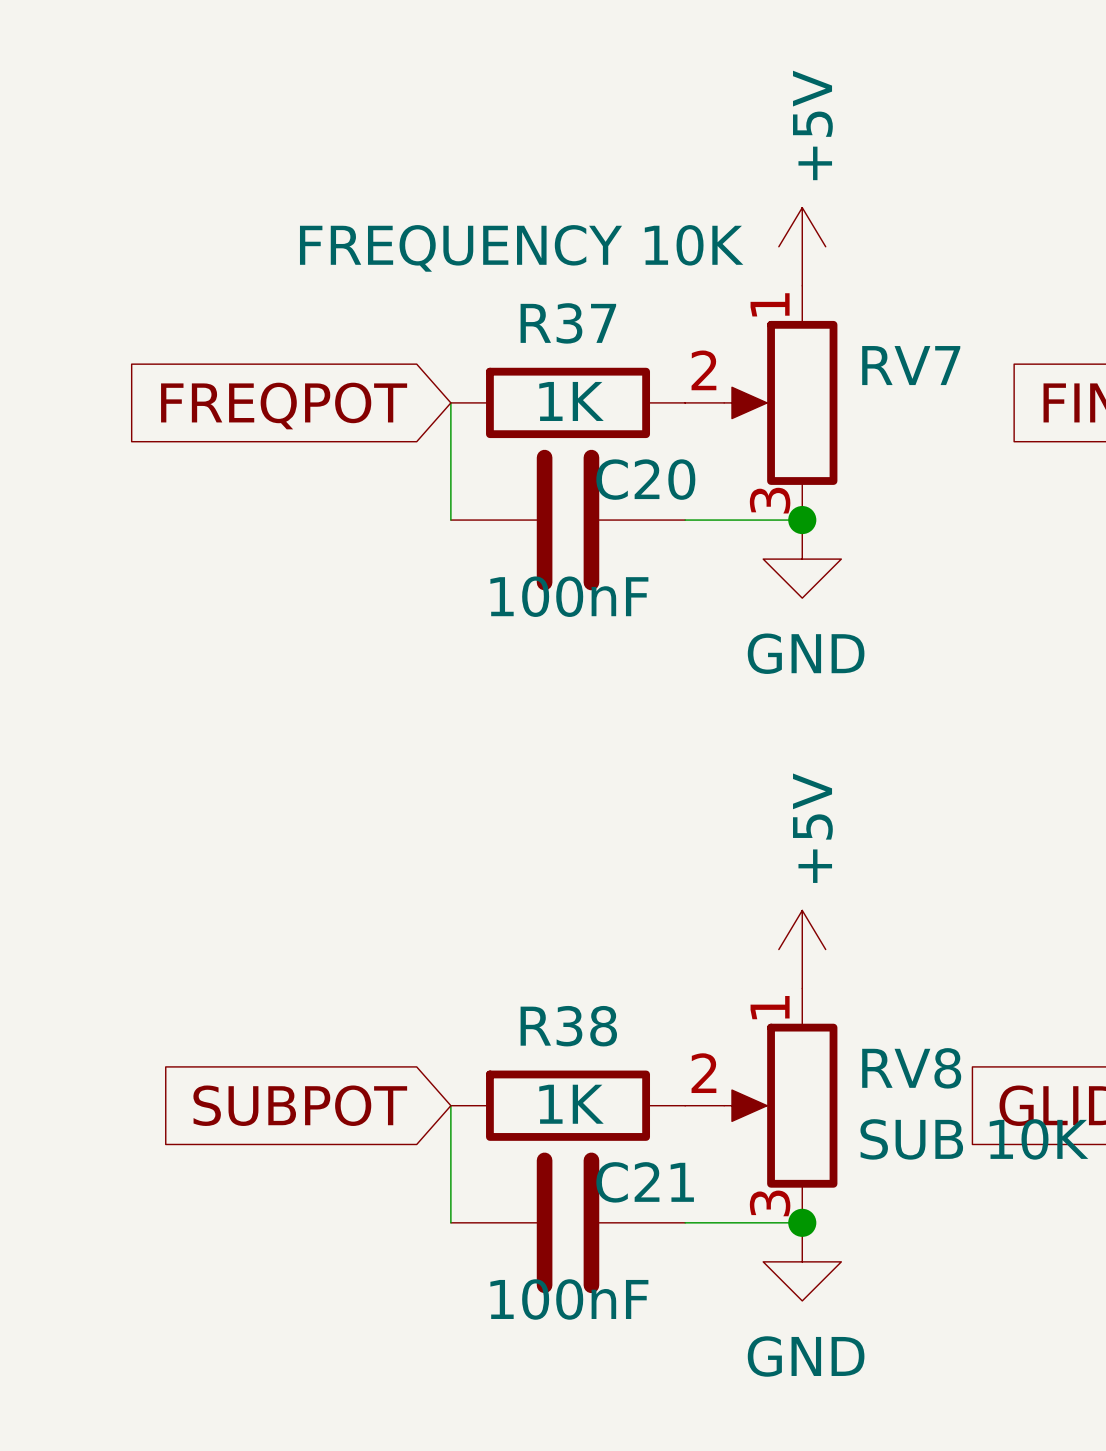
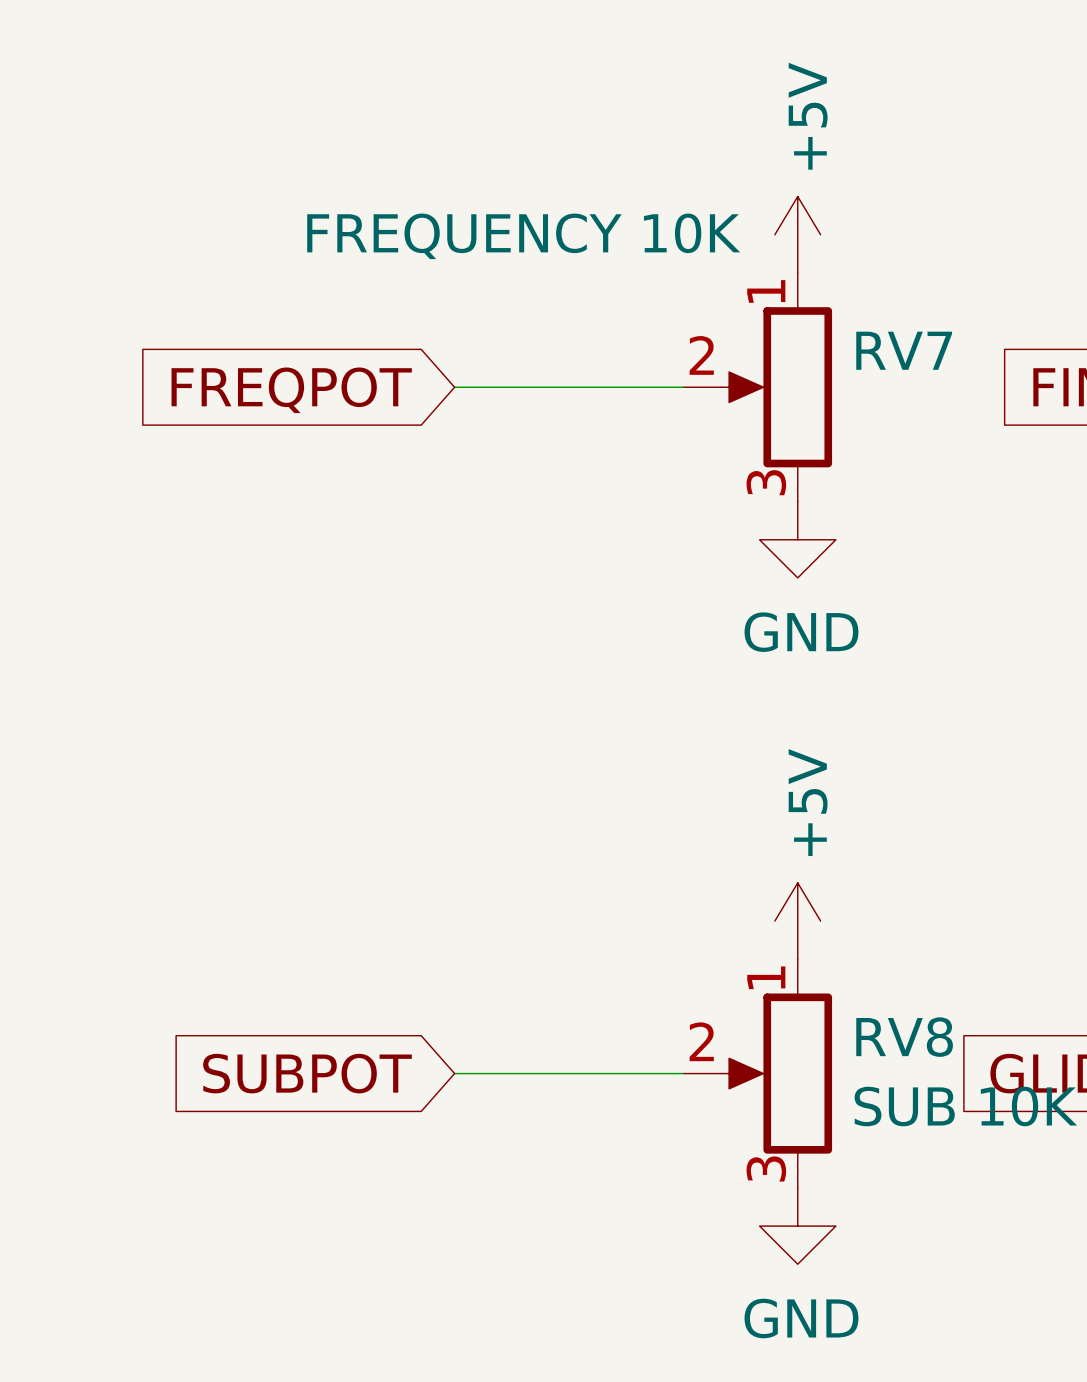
wire: (450, 402) (450, 520) -> (454, 387) (683, 387)
R37: 1K (568, 402) -> none
C20: 100nF (568, 520) -> none
wire: (685, 520) (802, 520) -> none
junction: (802, 520) -> none
wire: (450, 1105) (450, 1222) -> (454, 1073) (683, 1073)
R38: 1K (568, 1105) -> none
C21: 100nF (568, 1222) -> none
wire: (685, 1222) (802, 1222) -> none
junction: (802, 1222) -> none

